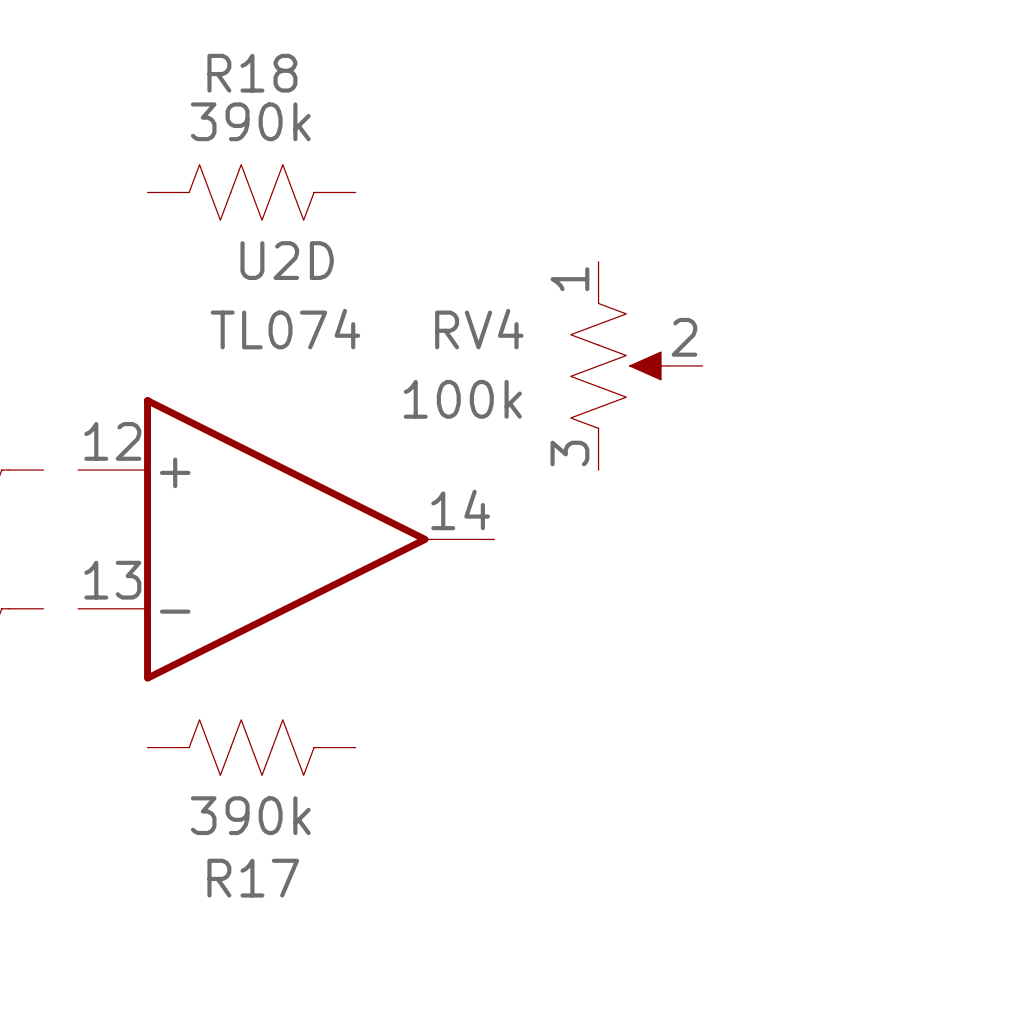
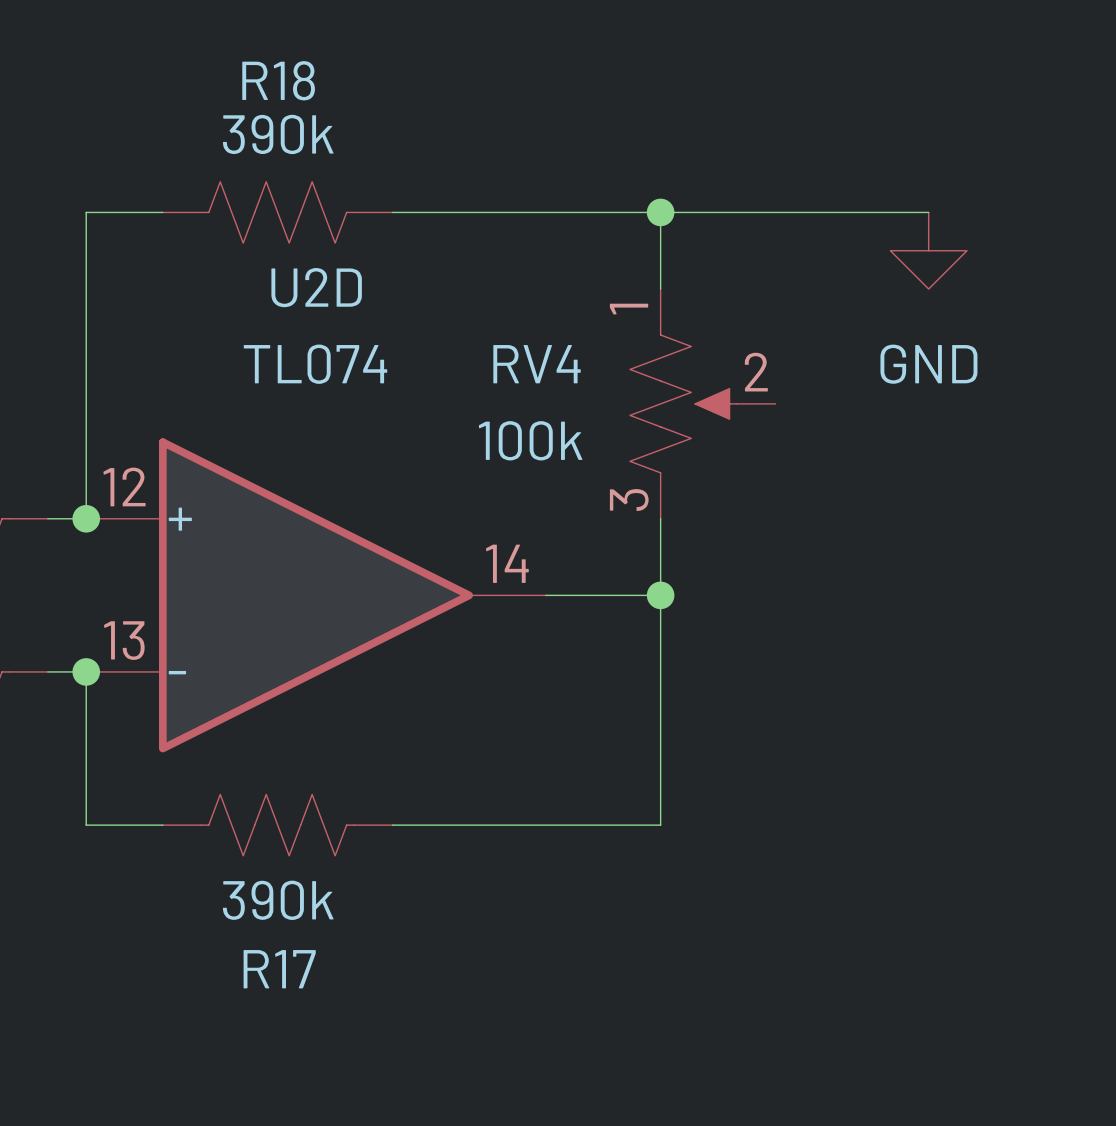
wire: none -> (162, 212) (86, 212) (86, 518) (47, 518)
wire: none -> (392, 212) (928, 212)
wire: none -> (660, 212) (660, 289)
junction: none -> (660, 212)
power symbol: none -> GND (928, 250)
junction: none -> (86, 518)
wire: none -> (660, 518) (660, 825) (392, 825)
wire: none -> (545, 595) (660, 595)
junction: none -> (660, 595)
wire: none -> (47, 671) (86, 671) (86, 825) (162, 825)
junction: none -> (86, 671)

